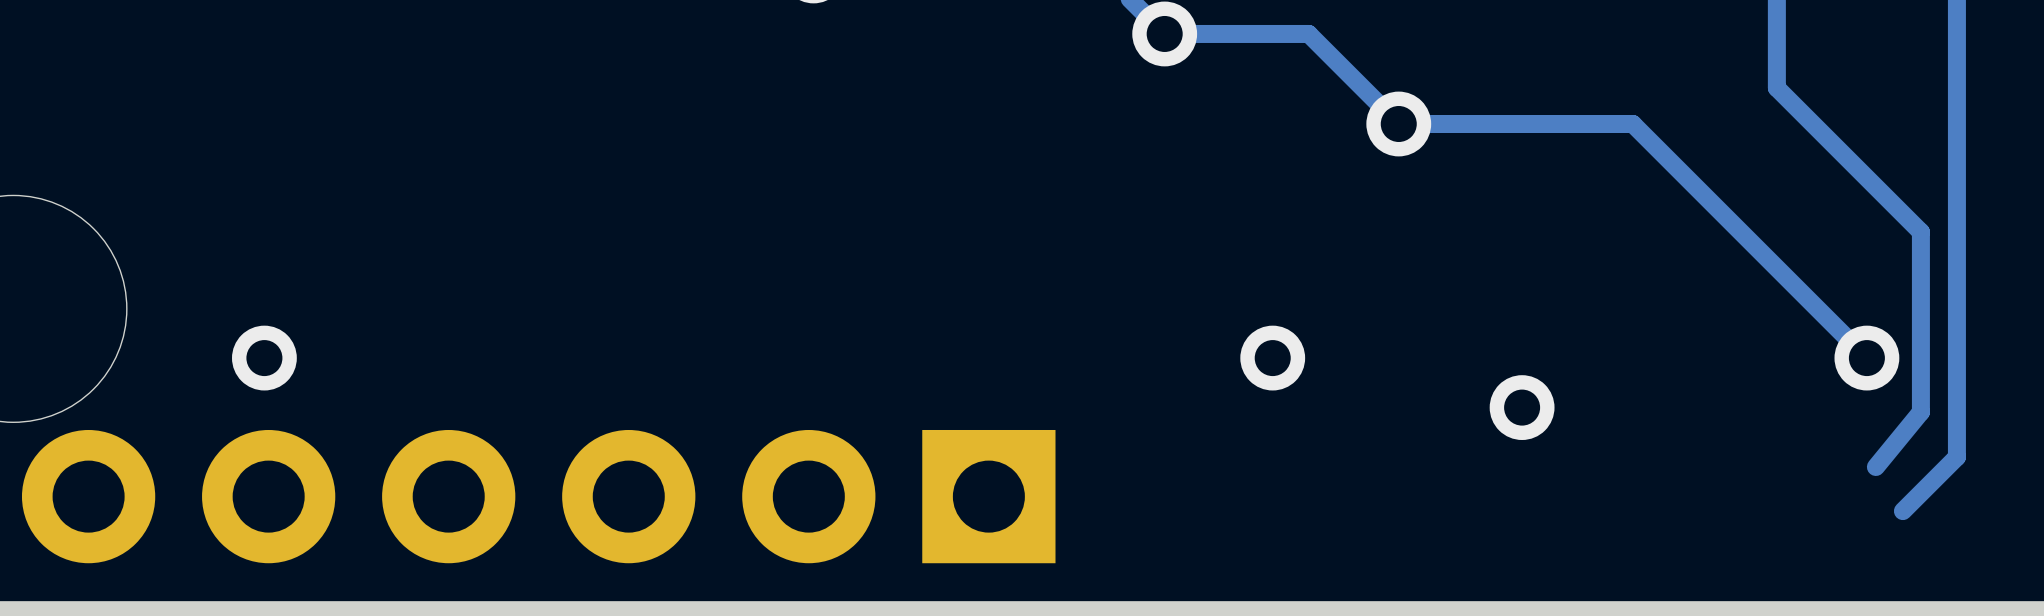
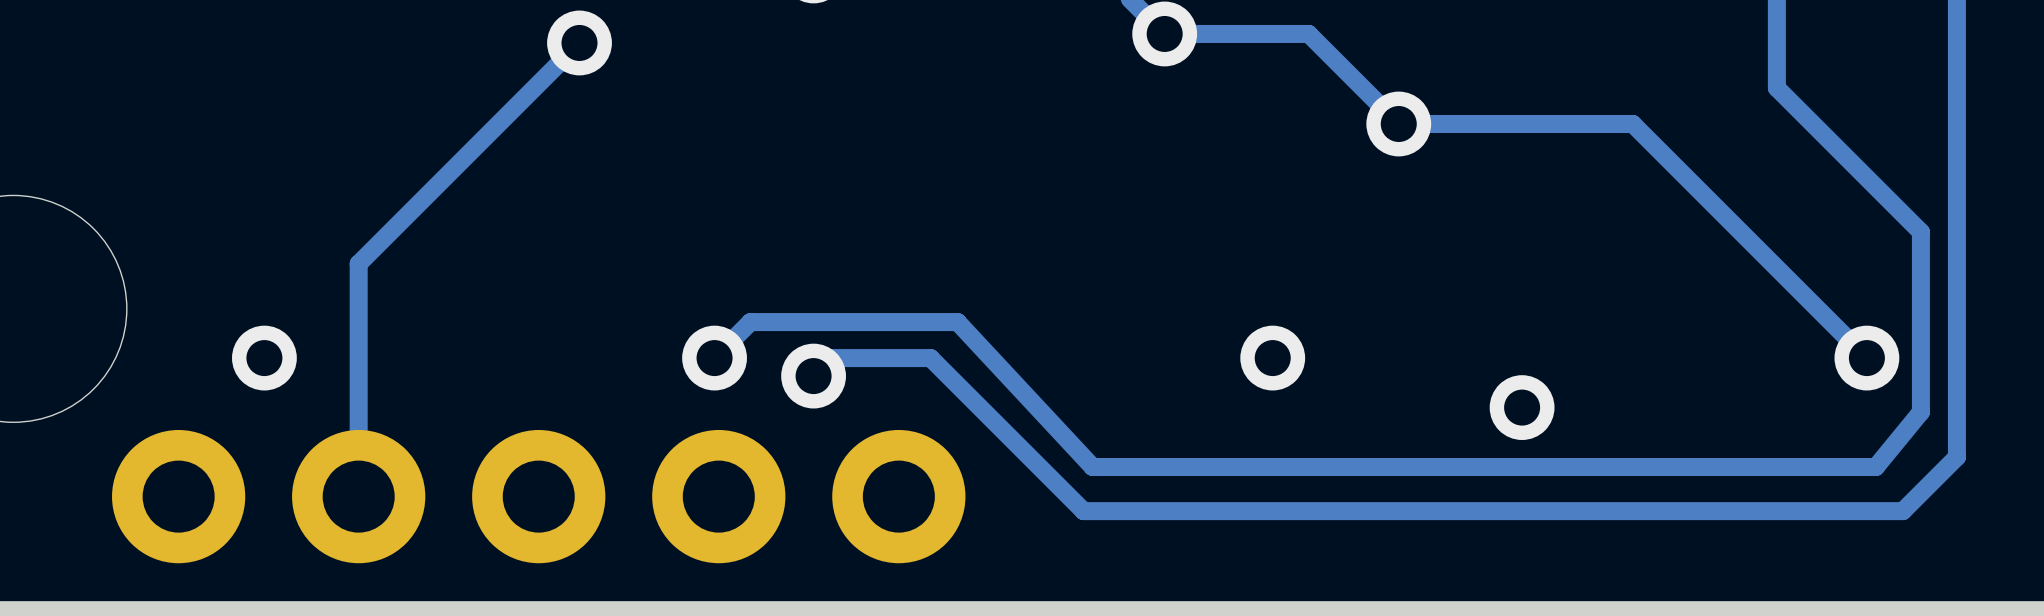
track: none -> (579, 42) (358, 263) (358, 496)
via: none -> (579, 42)
track: none -> (714, 358) (750, 322) (957, 322) (1092, 467) (1875, 467)
via: none -> (714, 358)
track: none -> (813, 376) (831, 358) (930, 358) (1083, 511) (1902, 511)
via: none -> (813, 376)
part footprint: [21, 429, 1056, 564] -> [112, 429, 966, 564]

